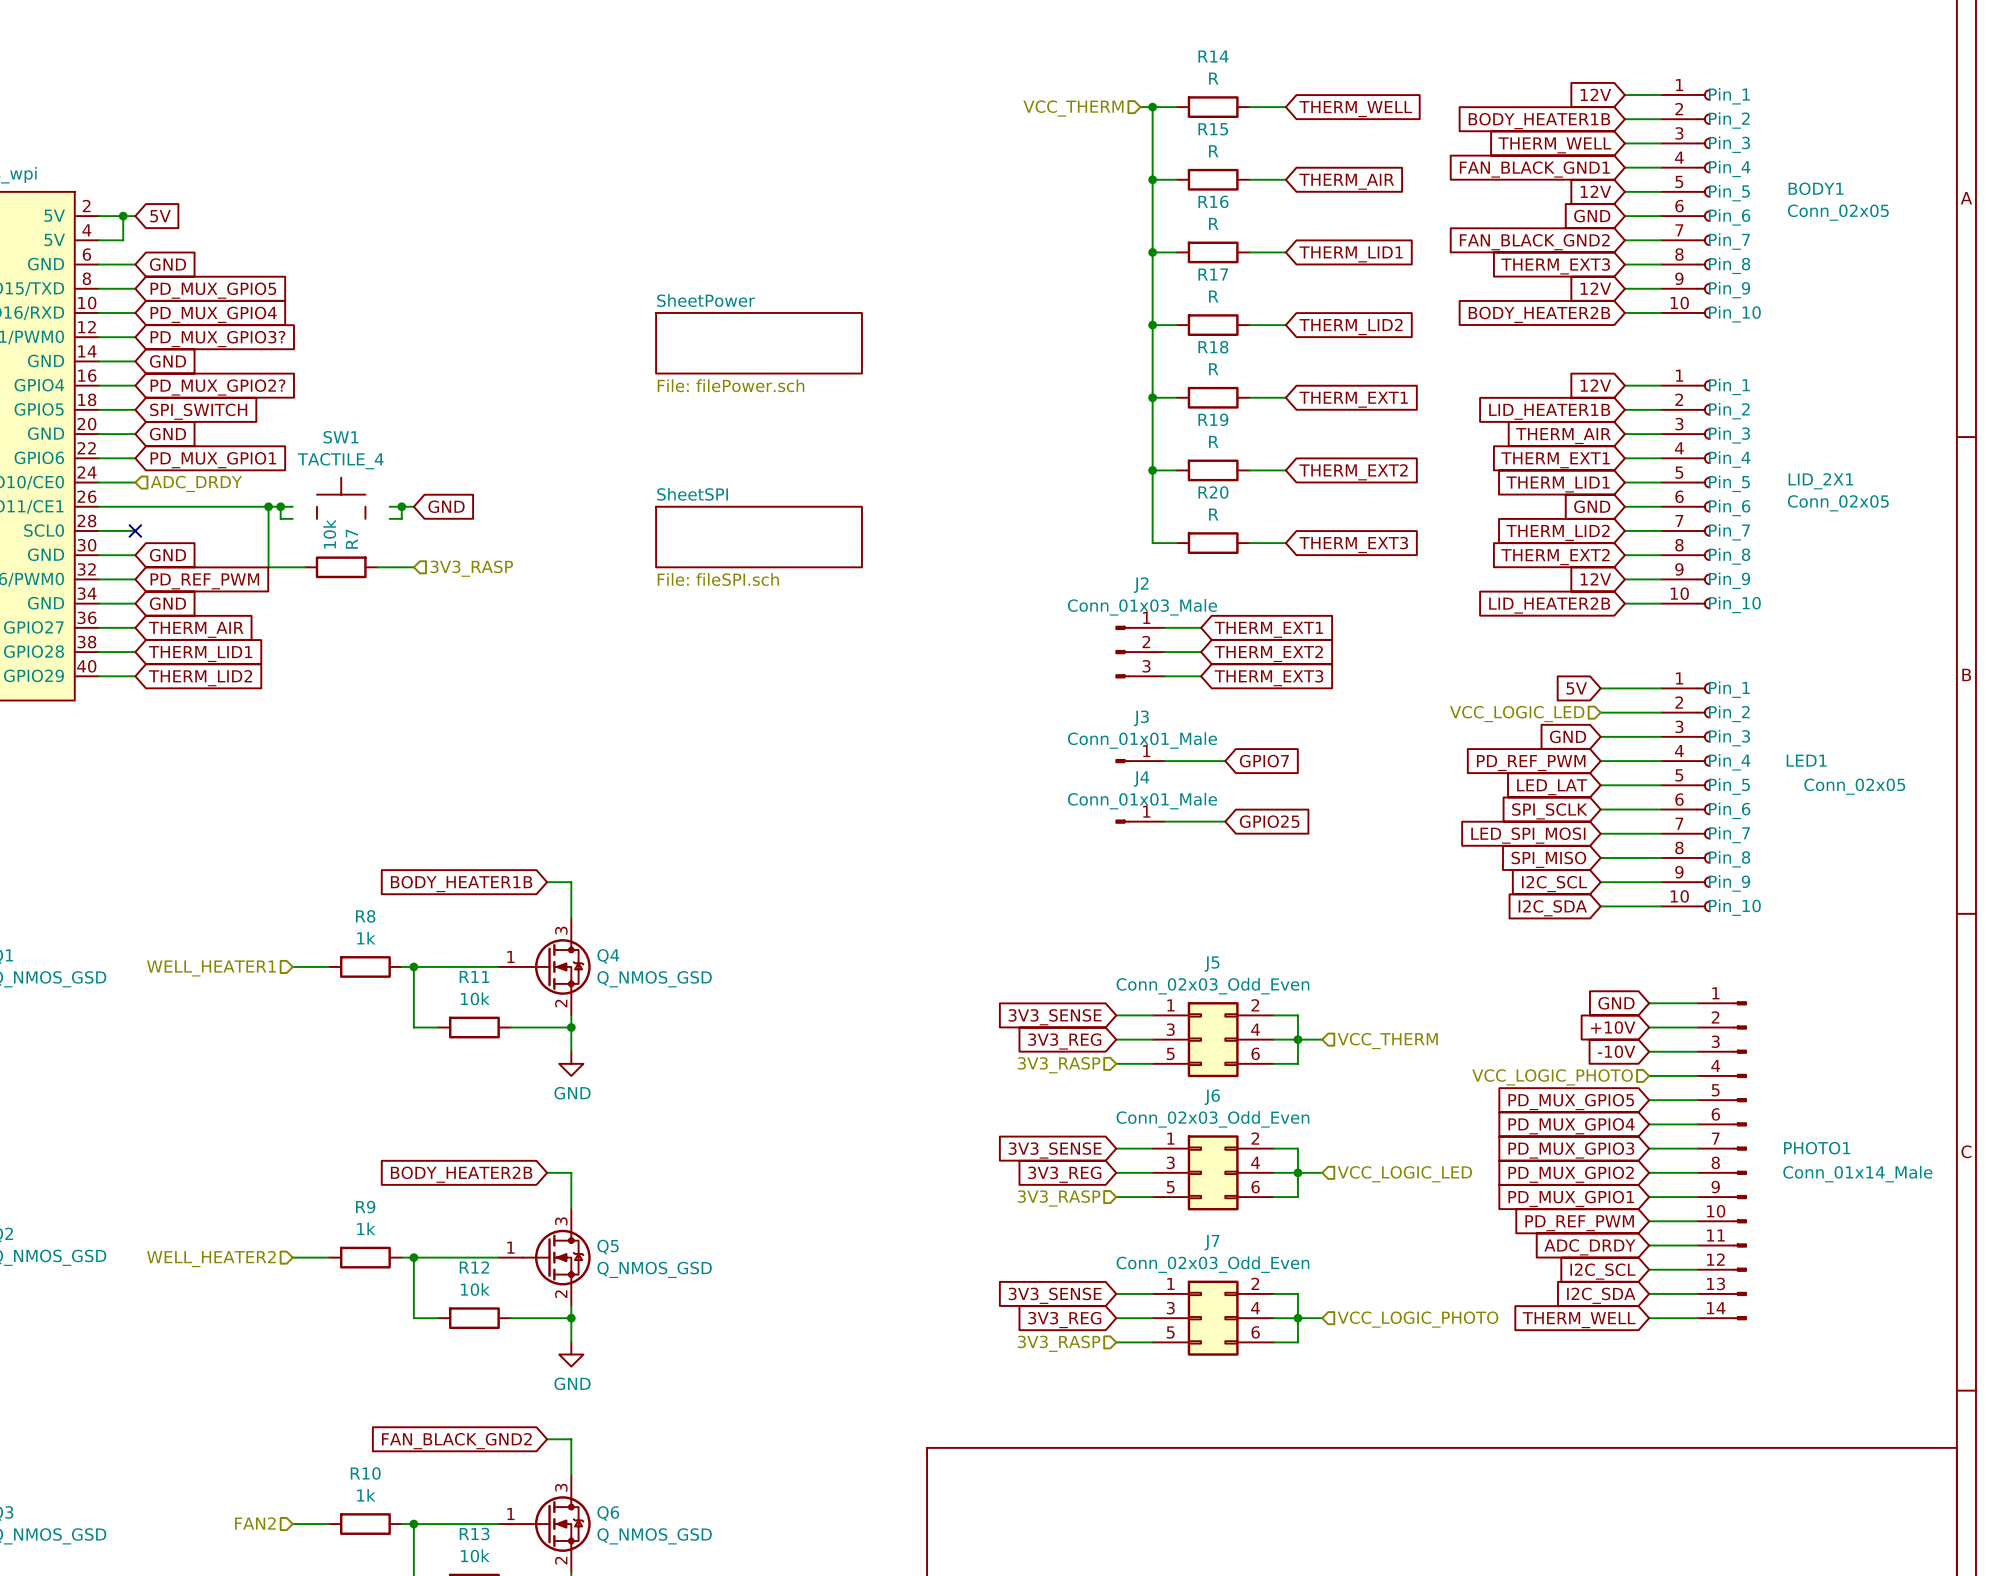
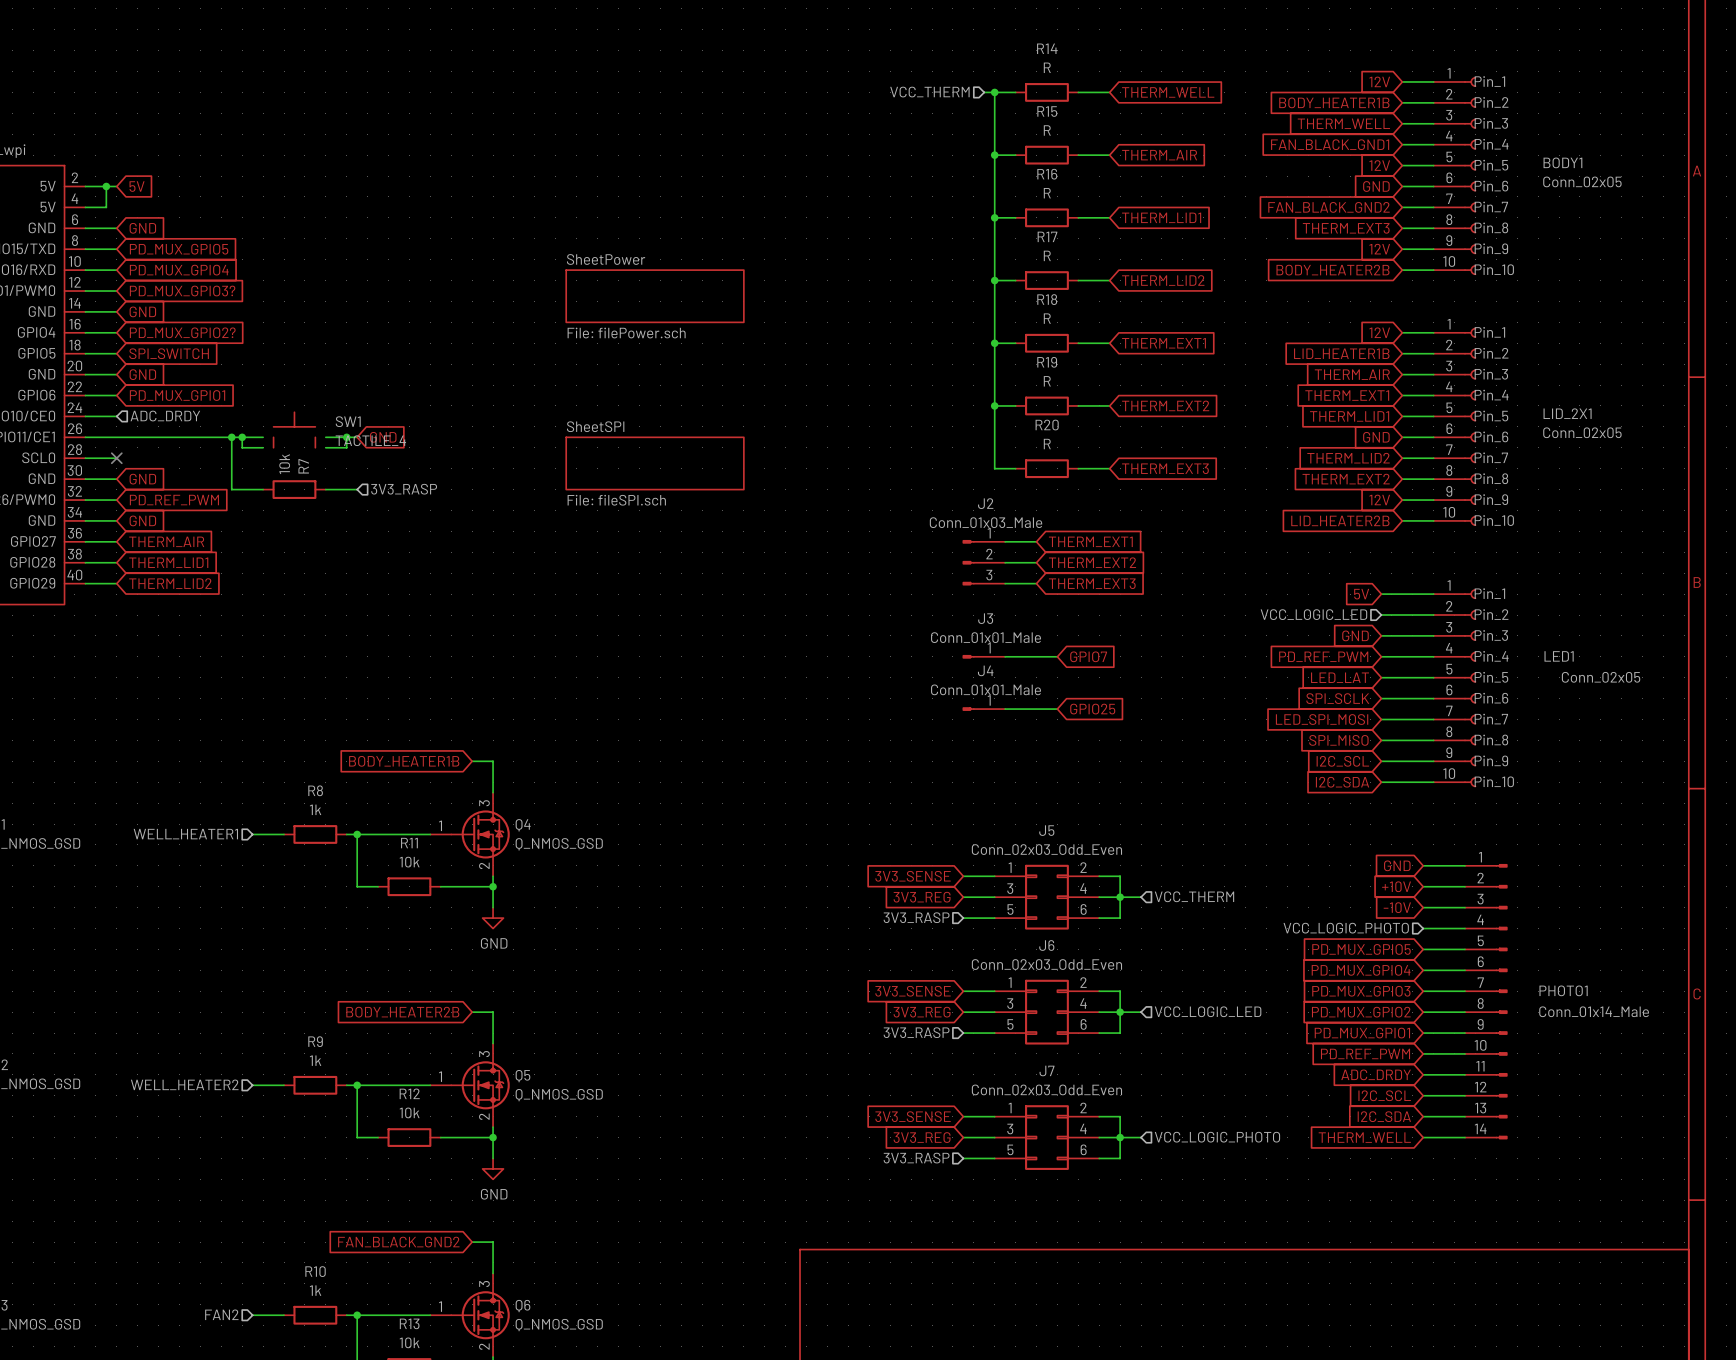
SW1 name position: SW1 (341, 437) -> SW1 (348, 421)
SW1 value position: TACTILE_4 (340, 461) -> TACTILE_4 (370, 440)
wire: none -> (252, 437) (263, 437)
wire: none -> (325, 437) (336, 437)
wire: none -> (252, 447) (263, 447)
wire: none -> (325, 447) (336, 447)

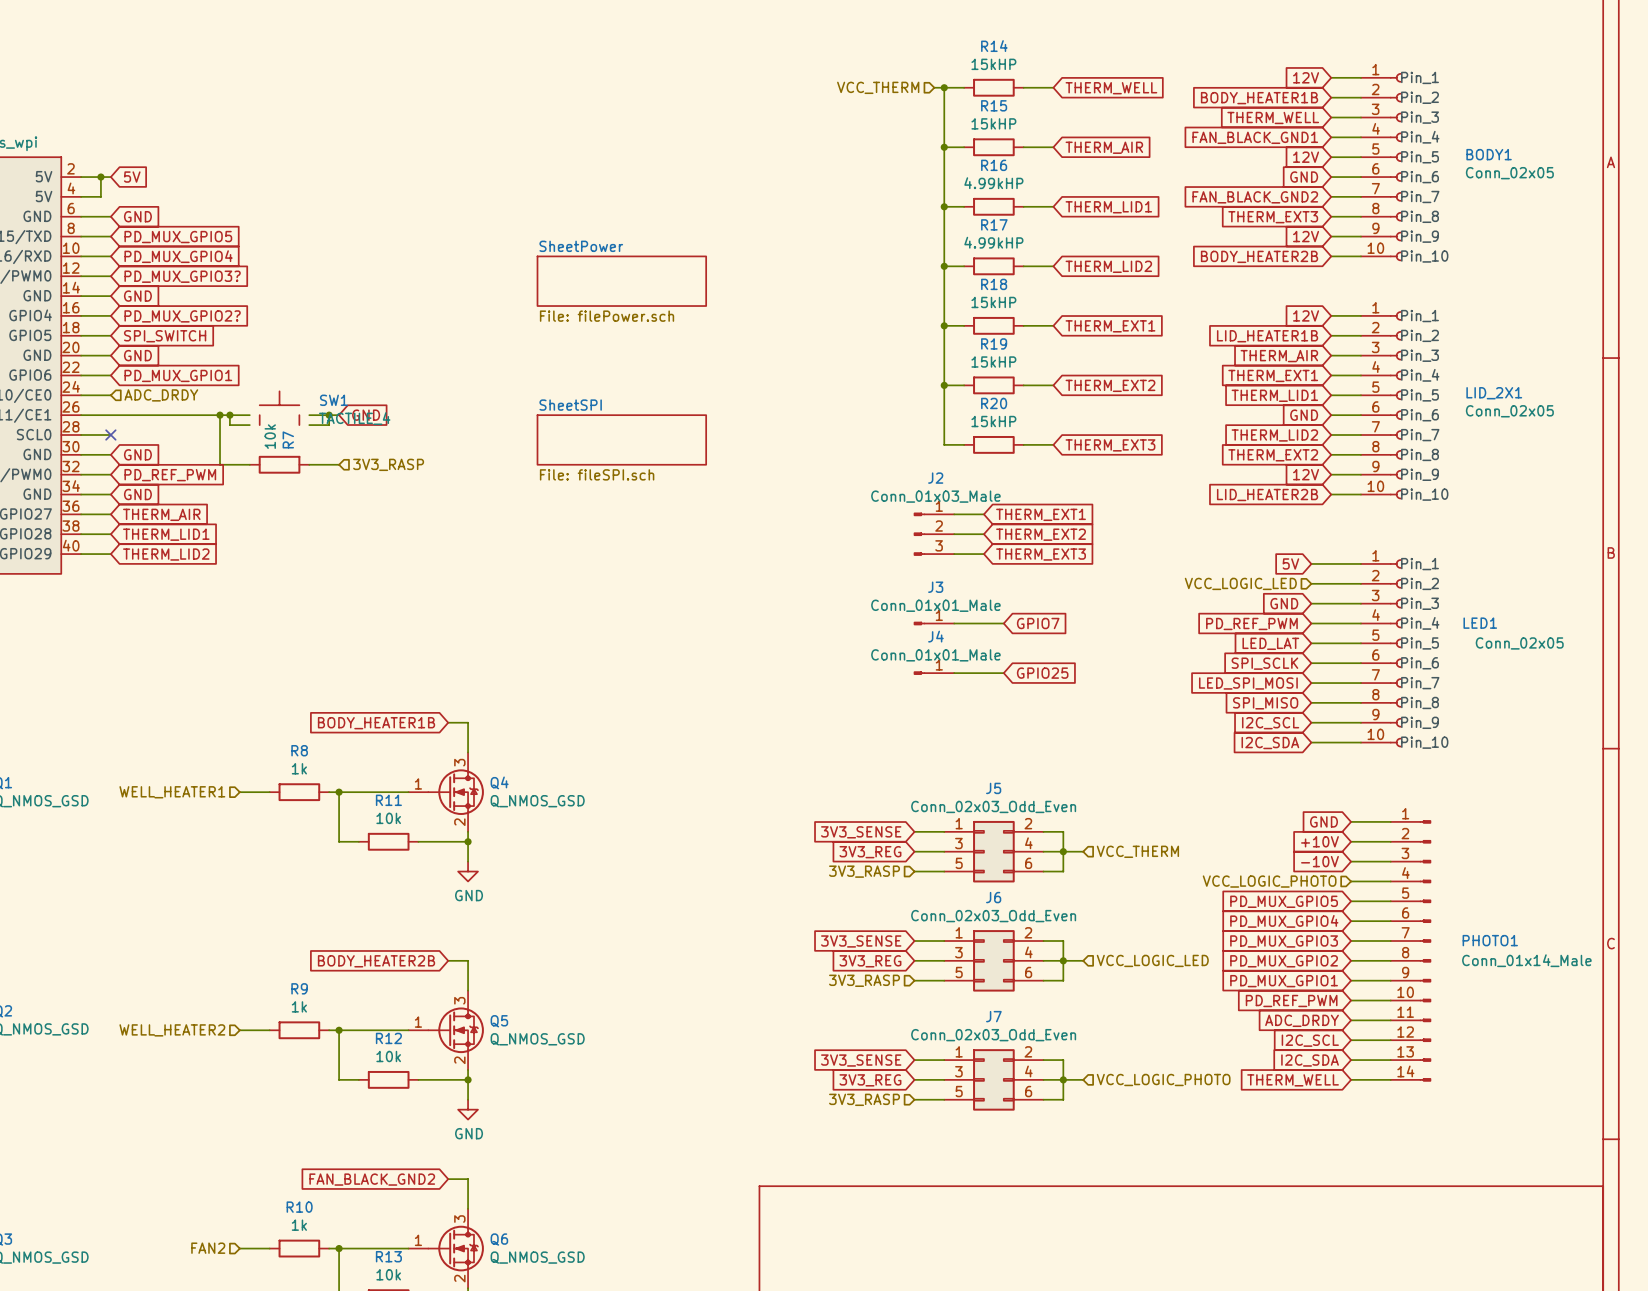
R14 value: R (1047, 67) -> 15kHP (993, 64)
R15 value: R (1047, 130) -> 15kHP (993, 123)
R16 value: R (1047, 193) -> 4.99kHP (993, 183)
R17 value: R (1047, 255) -> 4.99kHP (993, 242)
R18 value: R (1047, 318) -> 15kHP (993, 302)
R19 value: R (1047, 381) -> 15kHP (993, 362)
R20 value: R (1047, 444) -> 15kHP (993, 421)

